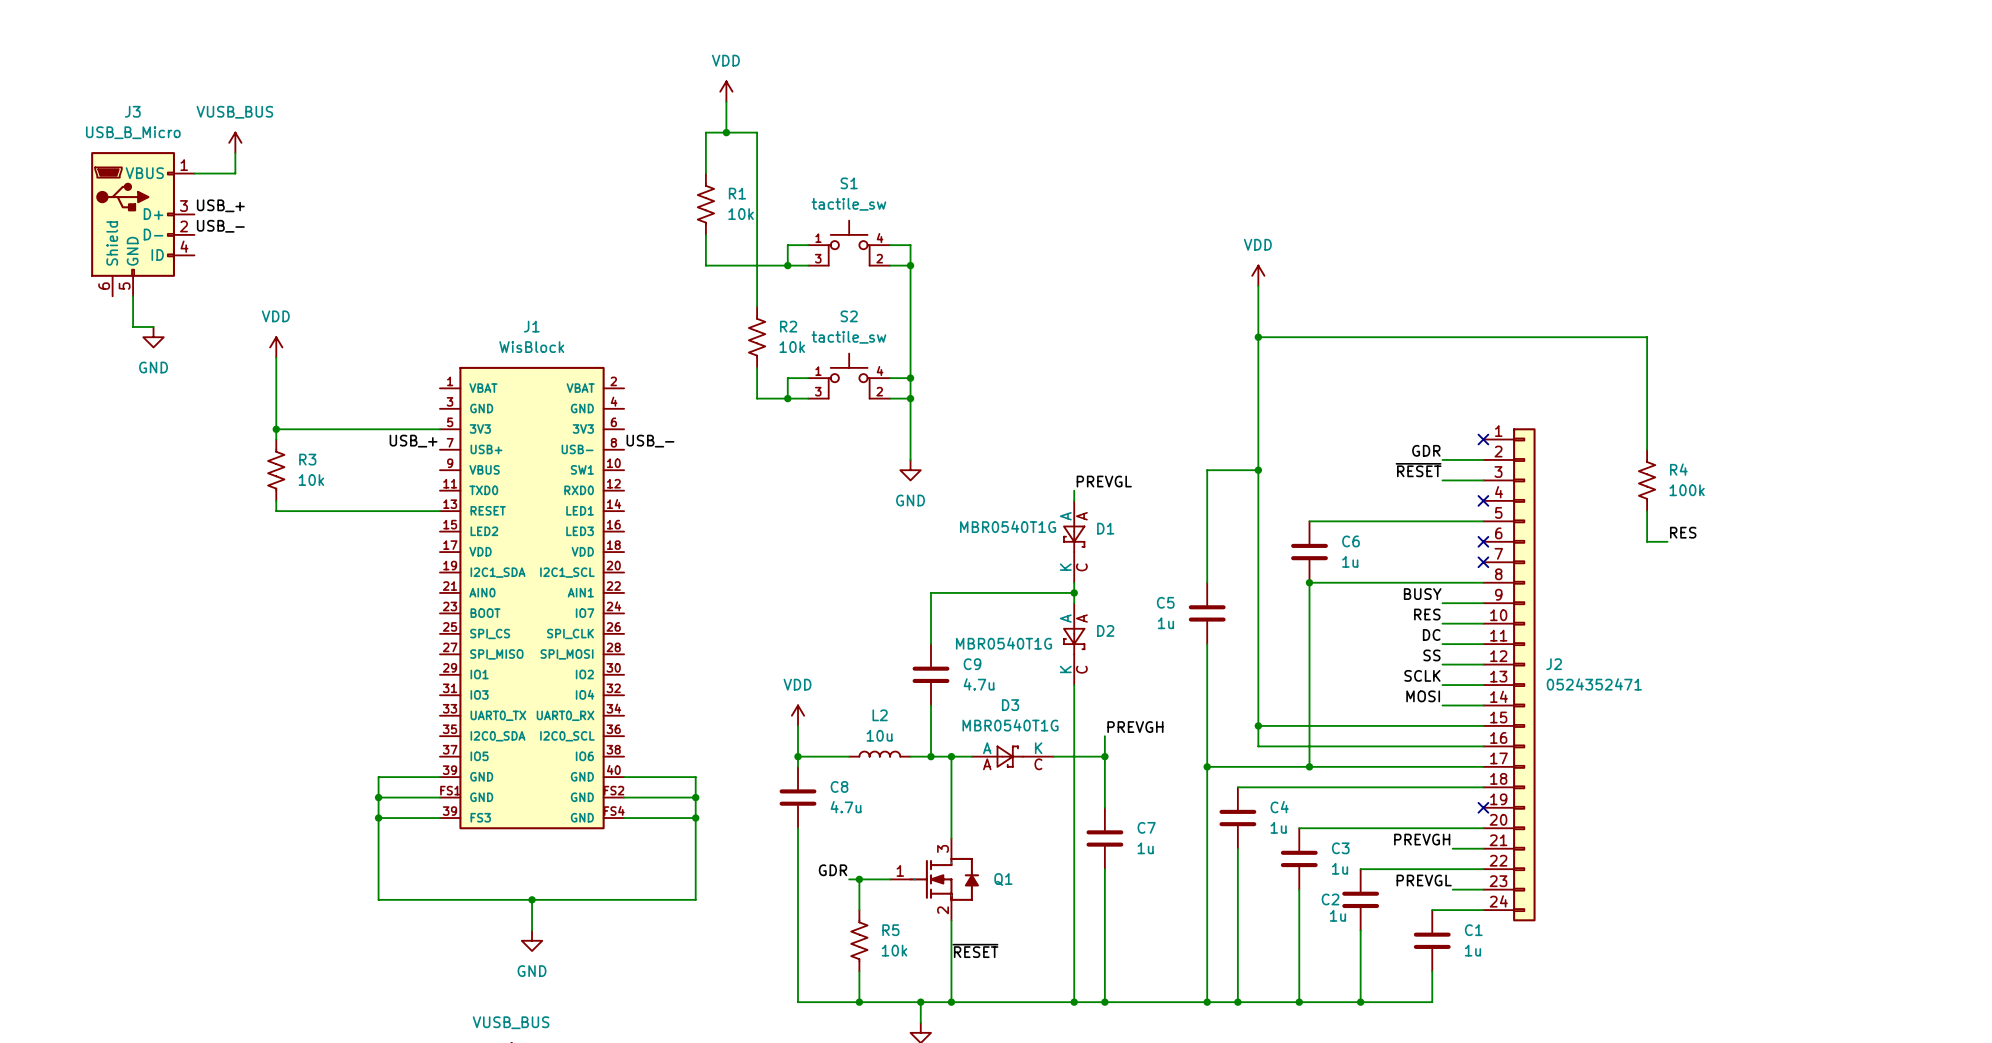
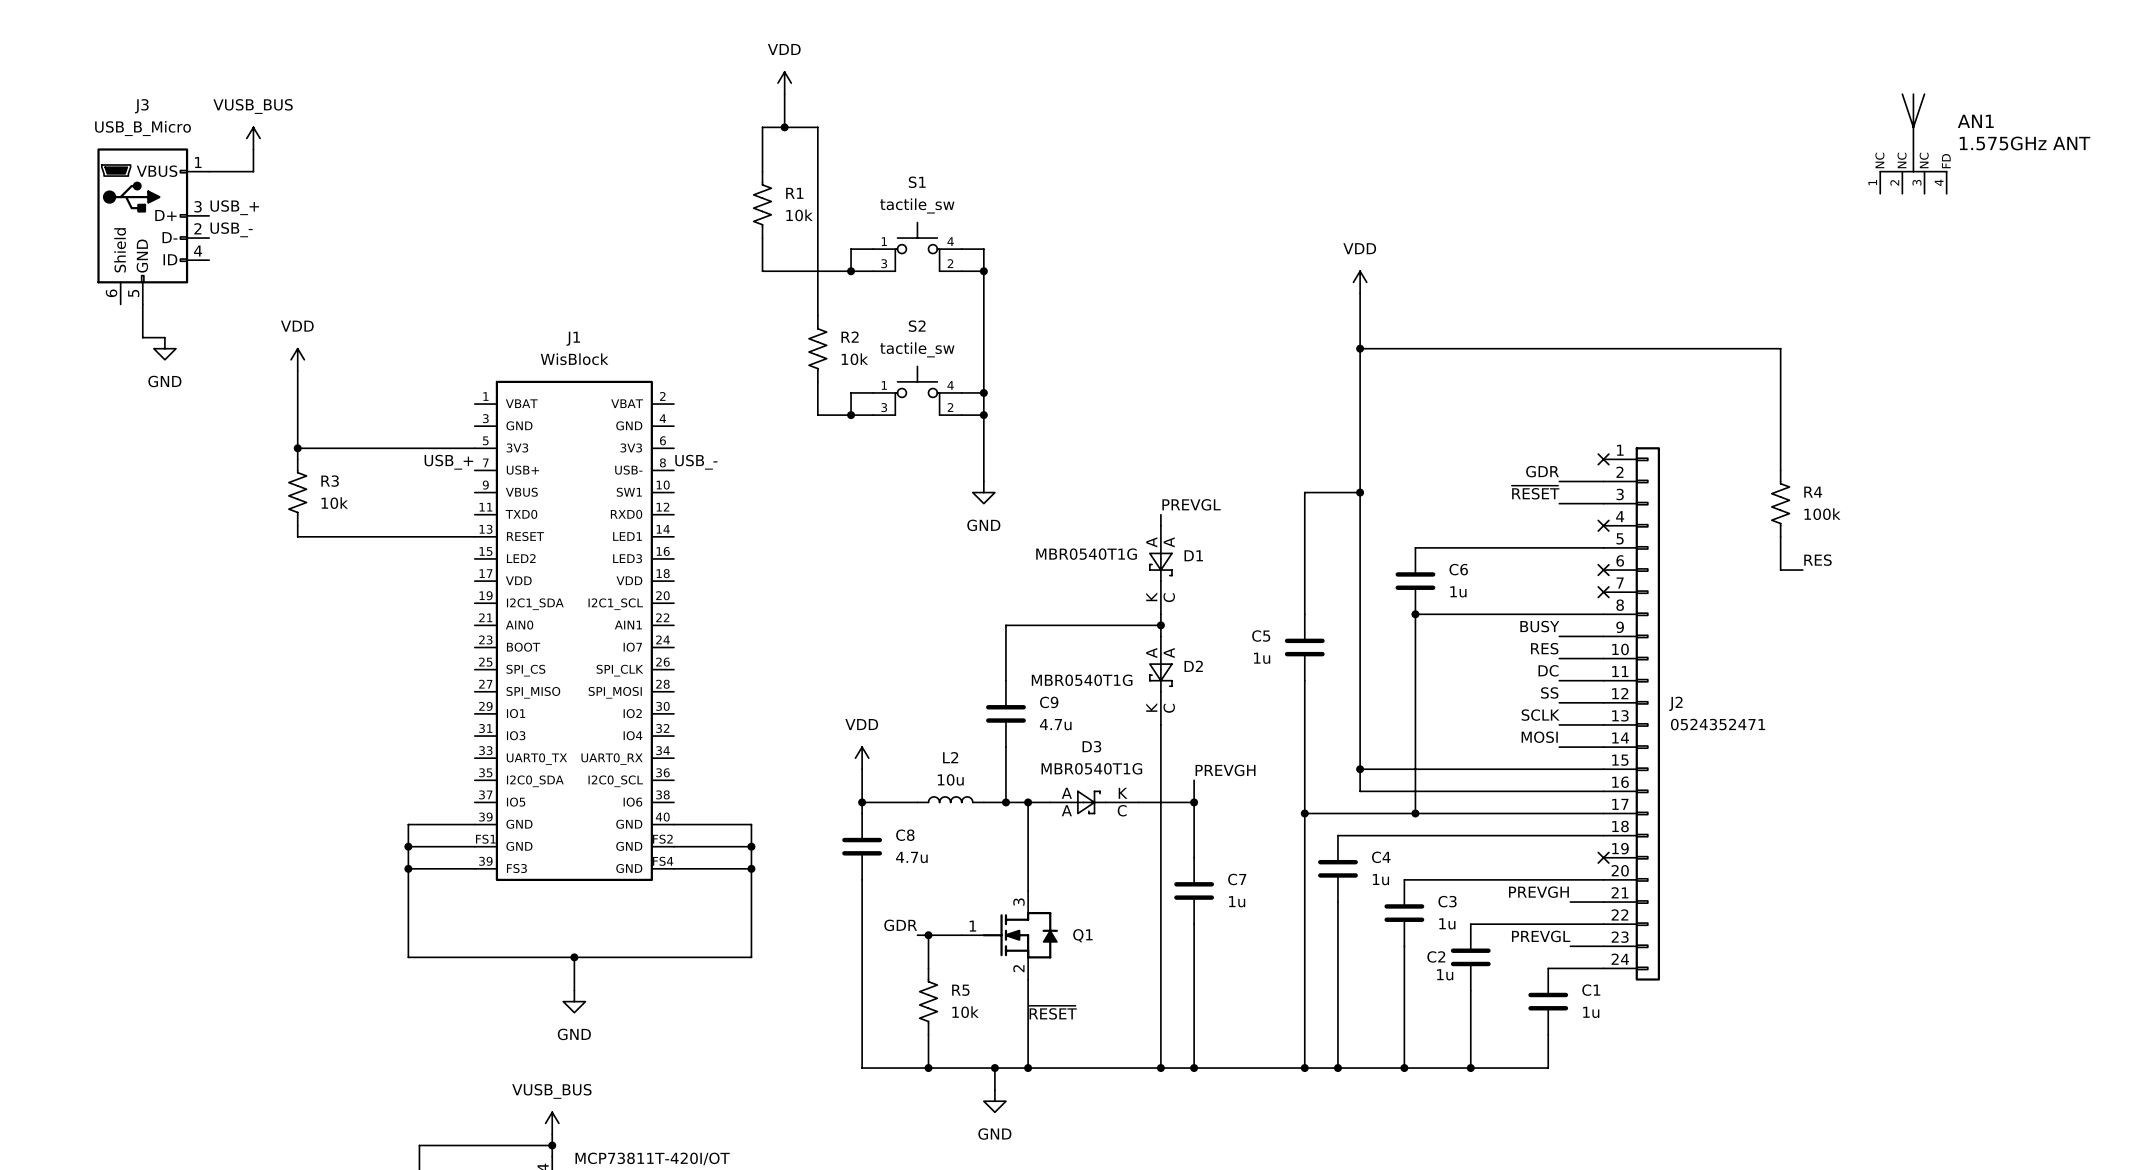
AN1: none -> 1.575GHz ANT (1913, 143)

